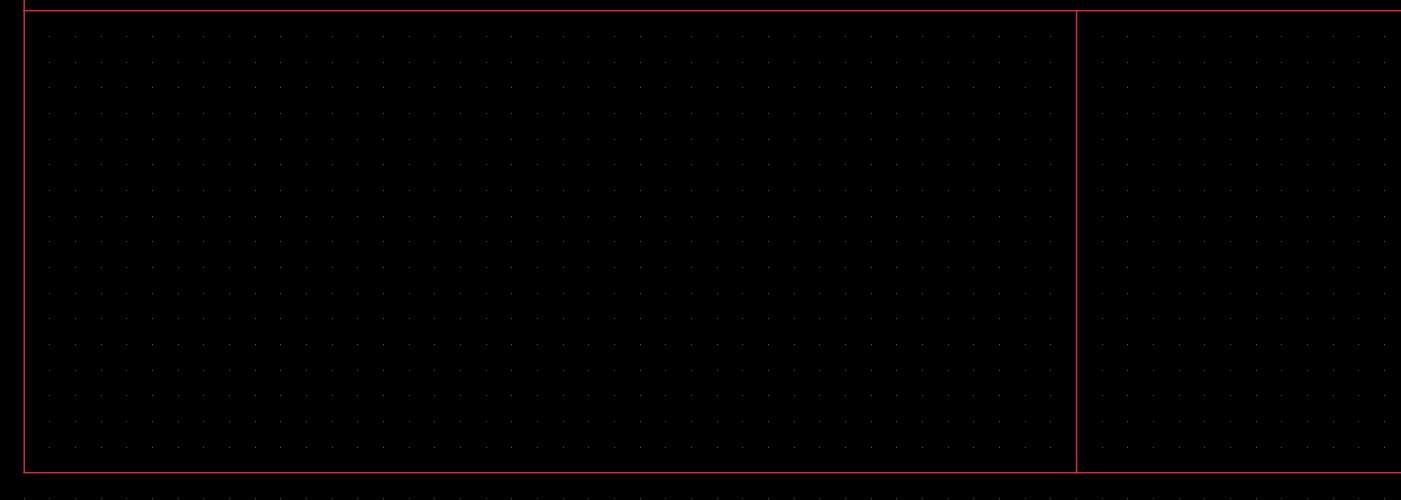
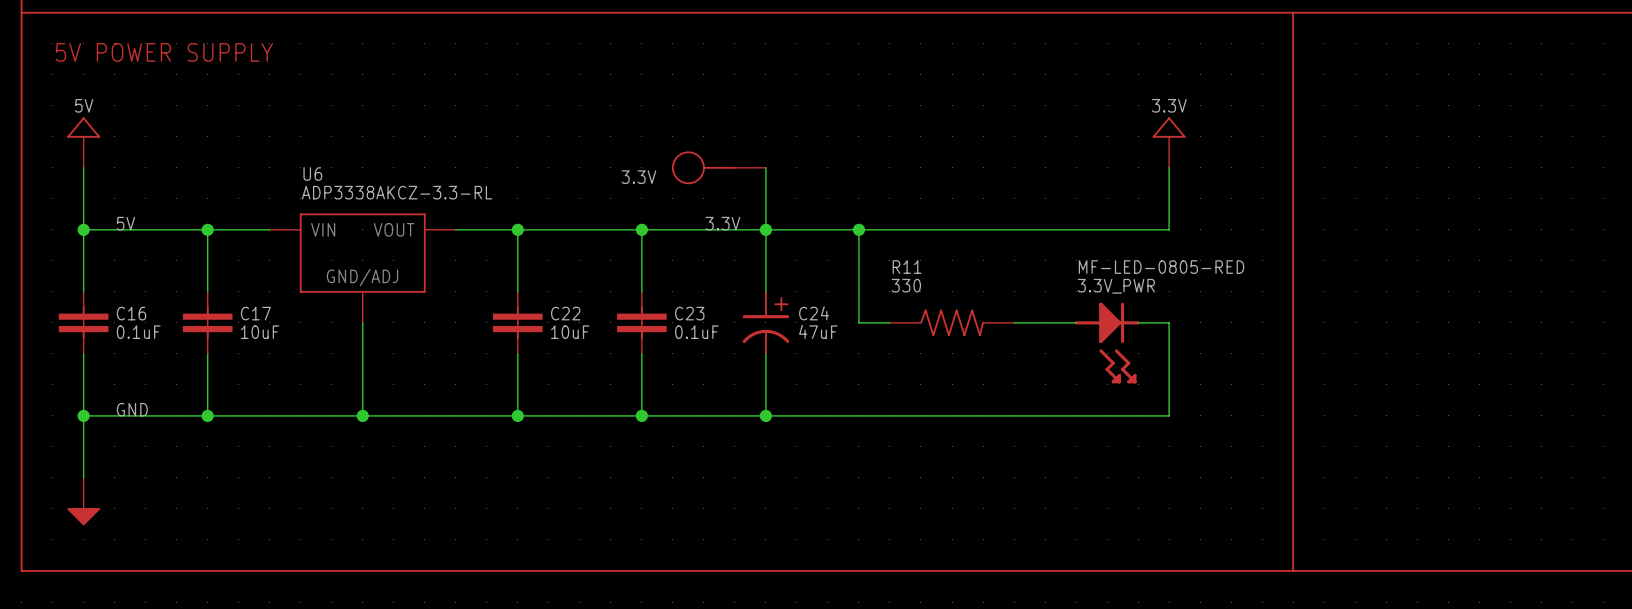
text: none -> 5V POWER SUPPLY (164, 52)
power symbol: none -> 5V (83, 142)
power symbol: none -> 3.3V (1169, 142)
wire: none -> (83, 167) (83, 291)
3.3V: none -> (718, 167)
wire: none -> (765, 167) (765, 291)
wire: none -> (1169, 167) (1169, 229) (455, 229)
label: none -> 5V (125, 223)
label: none -> 3.3V (722, 223)
wire: none -> (83, 229) (269, 229)
junction: none -> (83, 229)
wire: none -> (207, 229) (207, 291)
junction: none -> (207, 229)
wire: none -> (517, 229) (517, 291)
junction: none -> (517, 229)
wire: none -> (641, 229) (641, 291)
junction: none -> (641, 229)
junction: none -> (765, 229)
wire: none -> (858, 229) (858, 322) (889, 322)
junction: none -> (858, 229)
U6: none -> ADP3338AKCZ-3.3-RL (362, 268)
C16: none -> 0.1uF (83, 322)
C17: none -> 10uF (207, 322)
wire: none -> (362, 322) (362, 415)
C22: none -> 10uF (517, 322)
C23: none -> 0.1uF (641, 322)
C24: none -> 47uF (765, 322)
R11: none -> 330 (952, 322)
wire: none -> (1014, 322) (1076, 322)
wire: none -> (1138, 322) (1169, 322) (1169, 415) (83, 415)
3.3V_PWR: none -> MF-LED-0805-RED (1107, 343)
wire: none -> (83, 353) (83, 477)
wire: none -> (207, 353) (207, 415)
wire: none -> (517, 353) (517, 415)
wire: none -> (641, 353) (641, 415)
wire: none -> (765, 353) (765, 415)
label: none -> GND (132, 409)
junction: none -> (83, 415)
junction: none -> (207, 415)
junction: none -> (362, 415)
junction: none -> (517, 415)
junction: none -> (641, 415)
junction: none -> (765, 415)
power symbol: none -> (83, 501)

